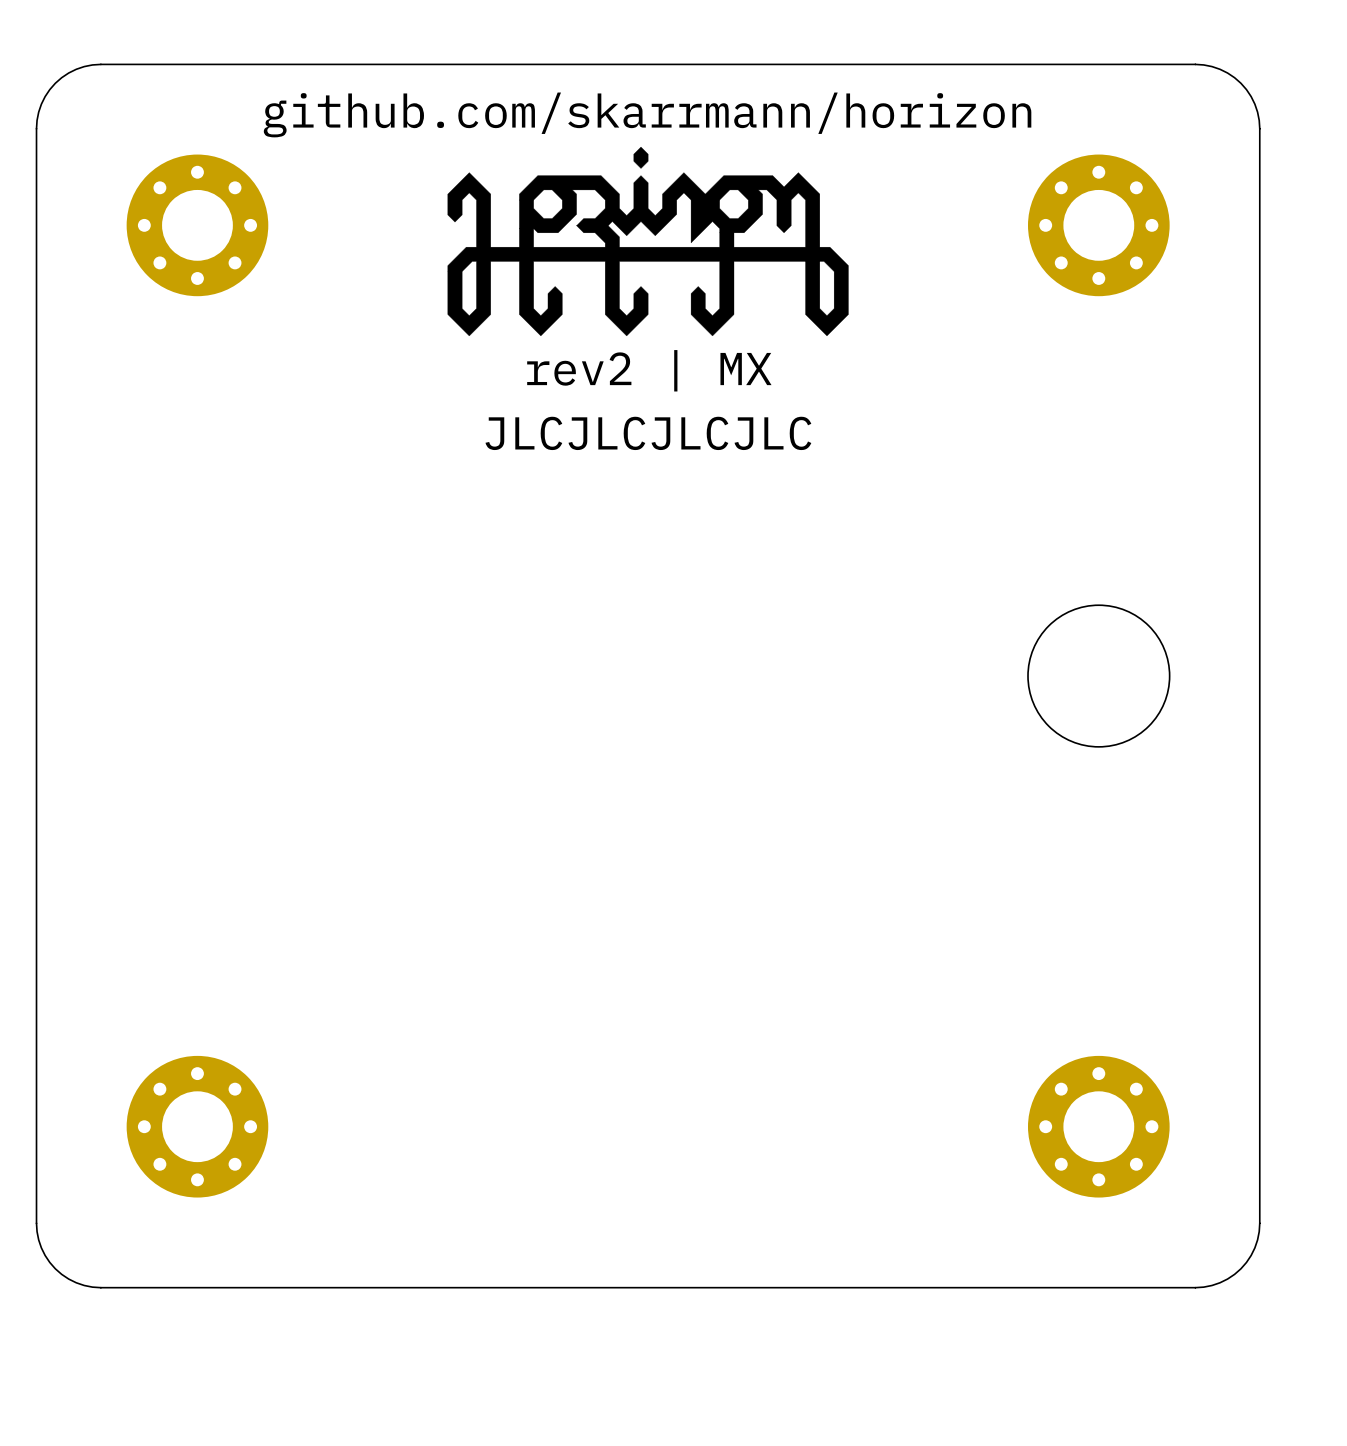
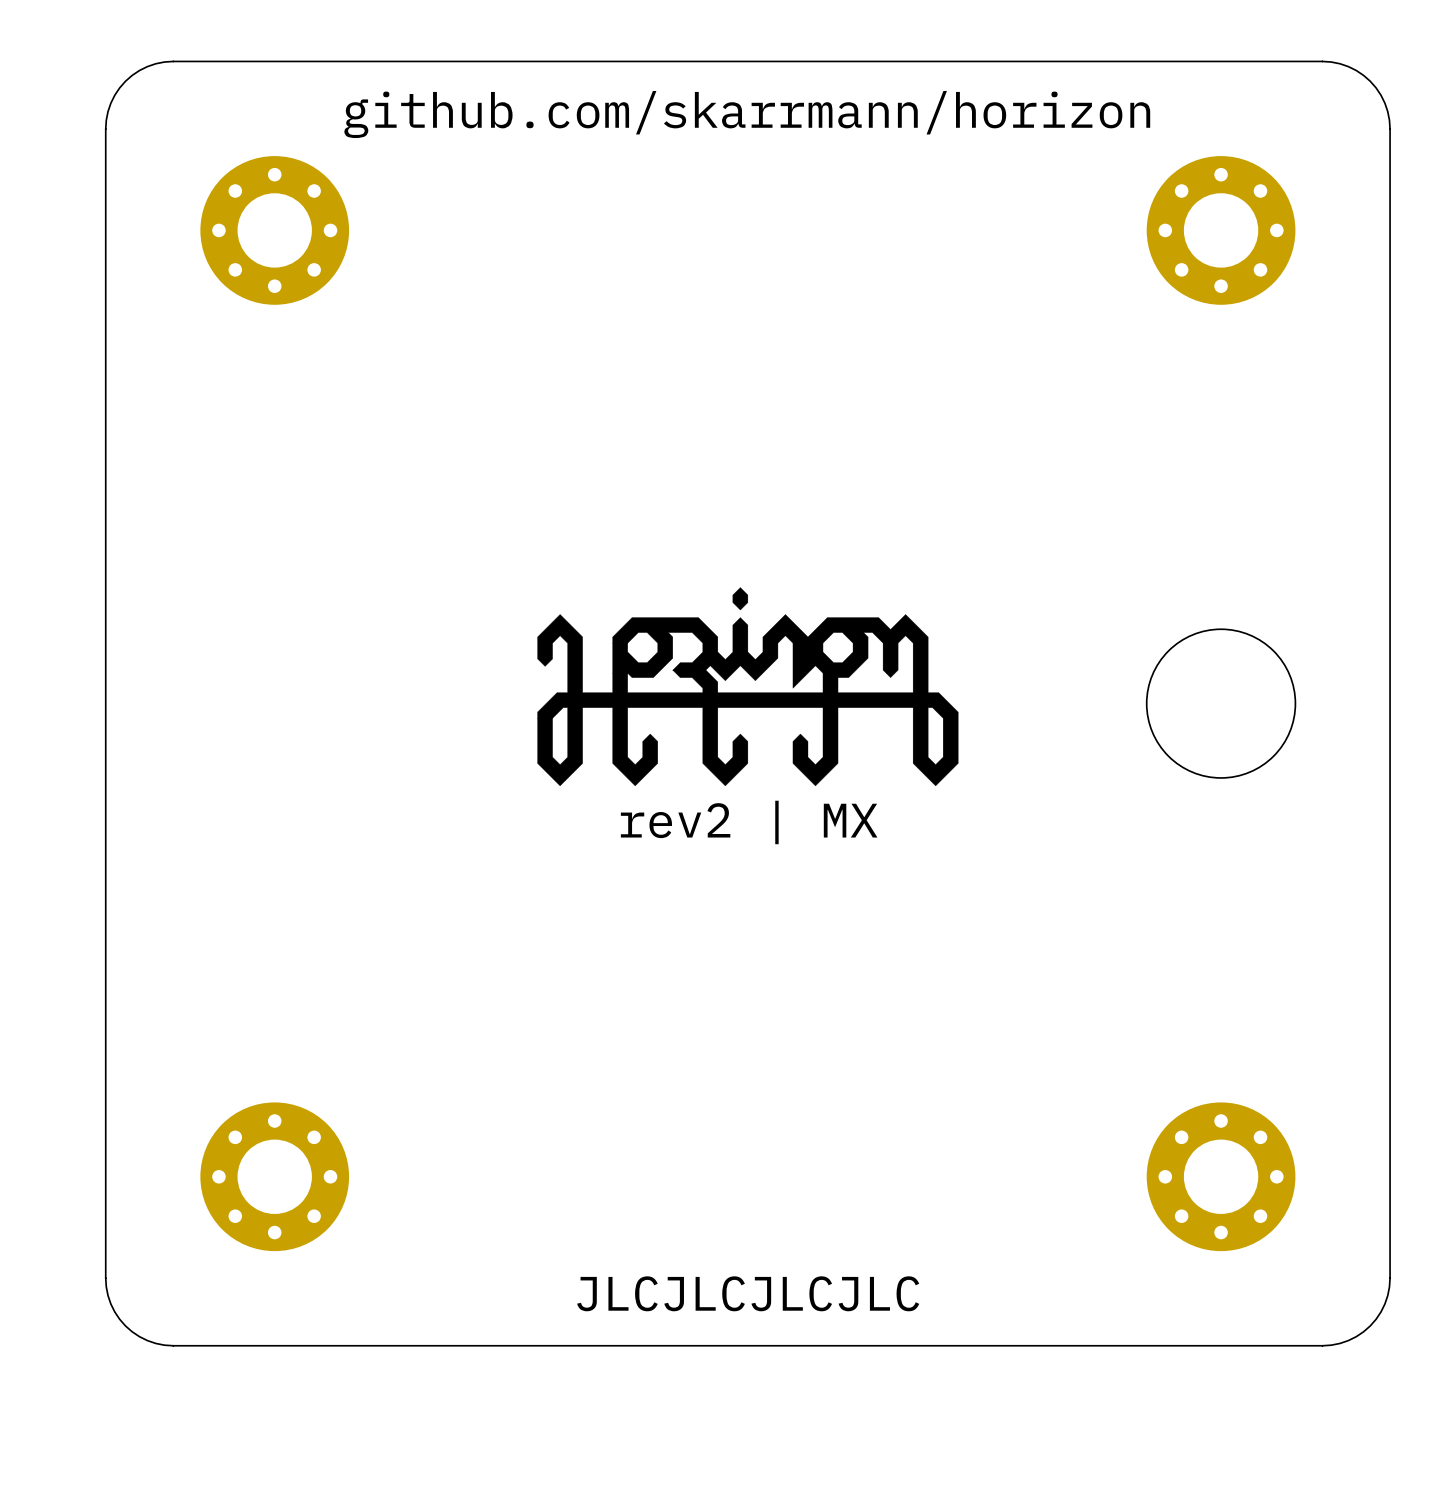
drawing position: (648, 241) -> (747, 686)
text position: rev2 | MX (649, 370) -> rev2 | MX (749, 822)
text position: JLCJLCJLCJLC (648, 433) -> JLCJLCJLCJLC (748, 1293)

